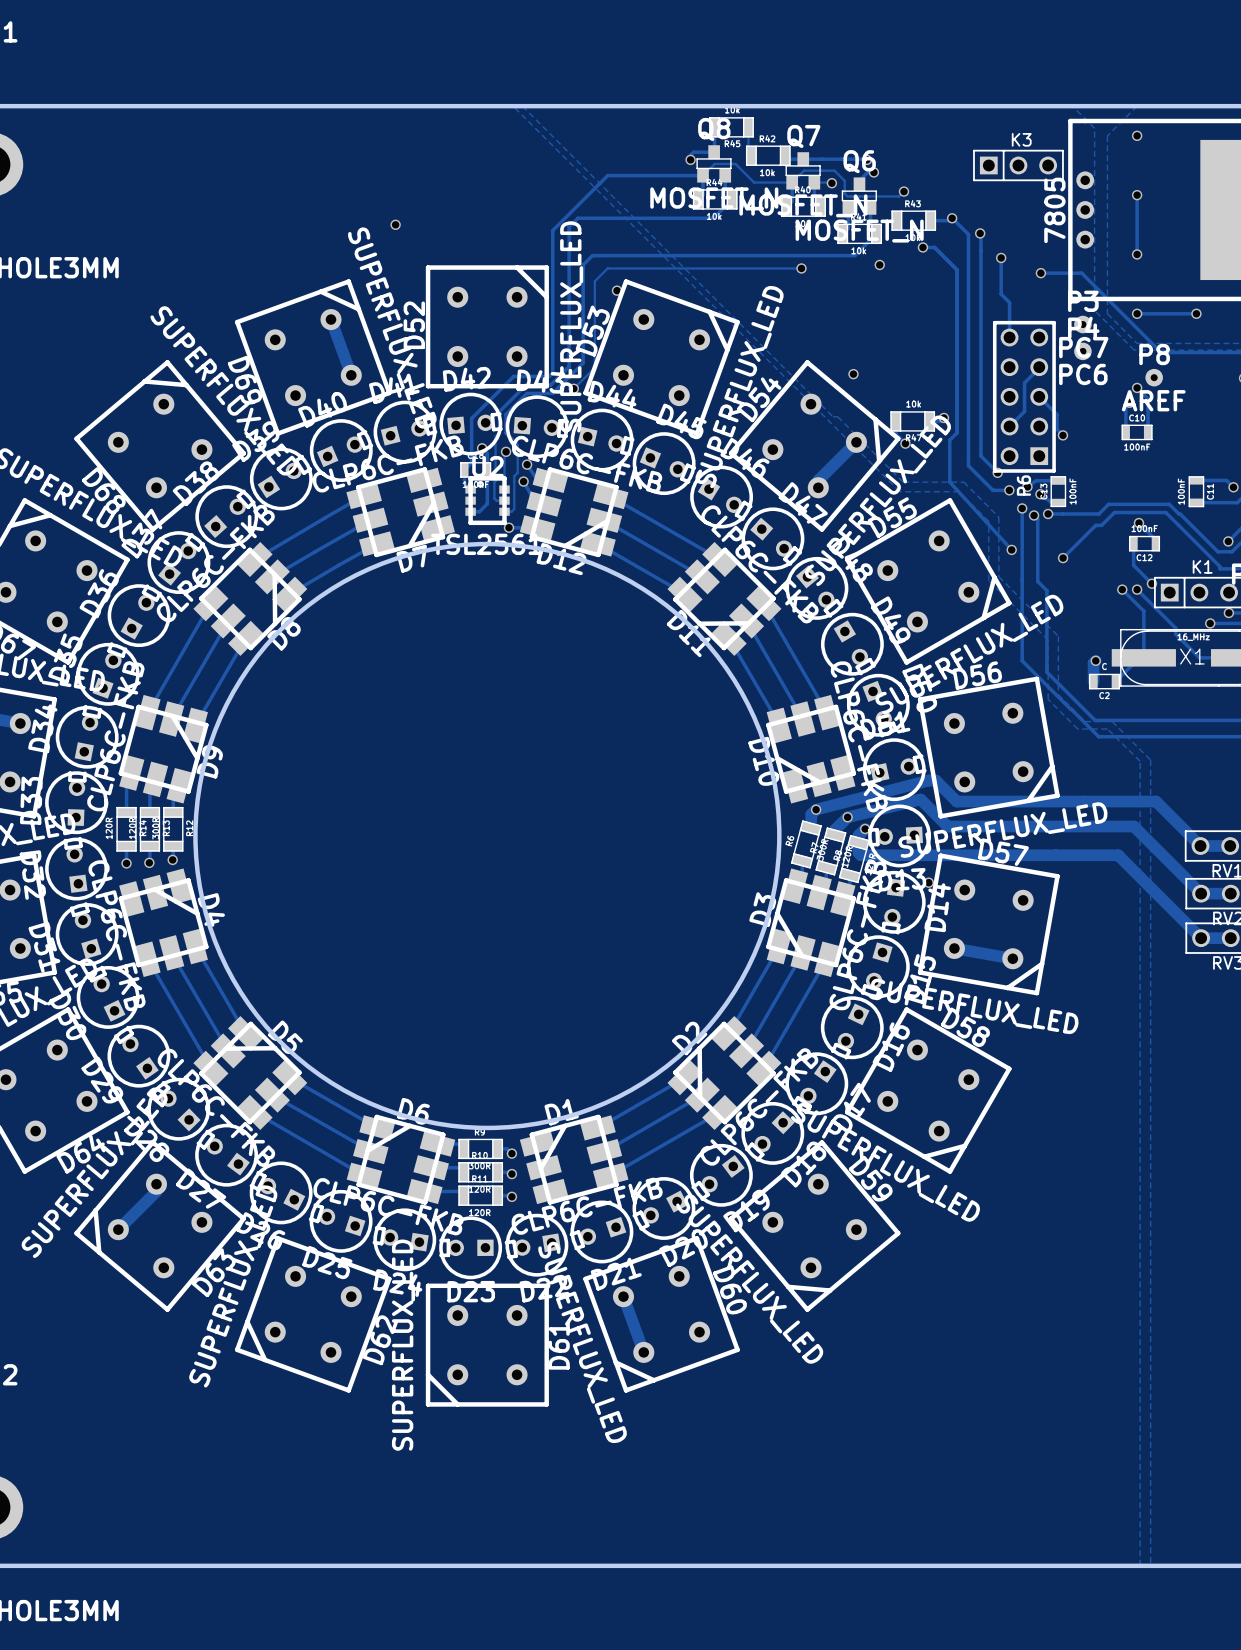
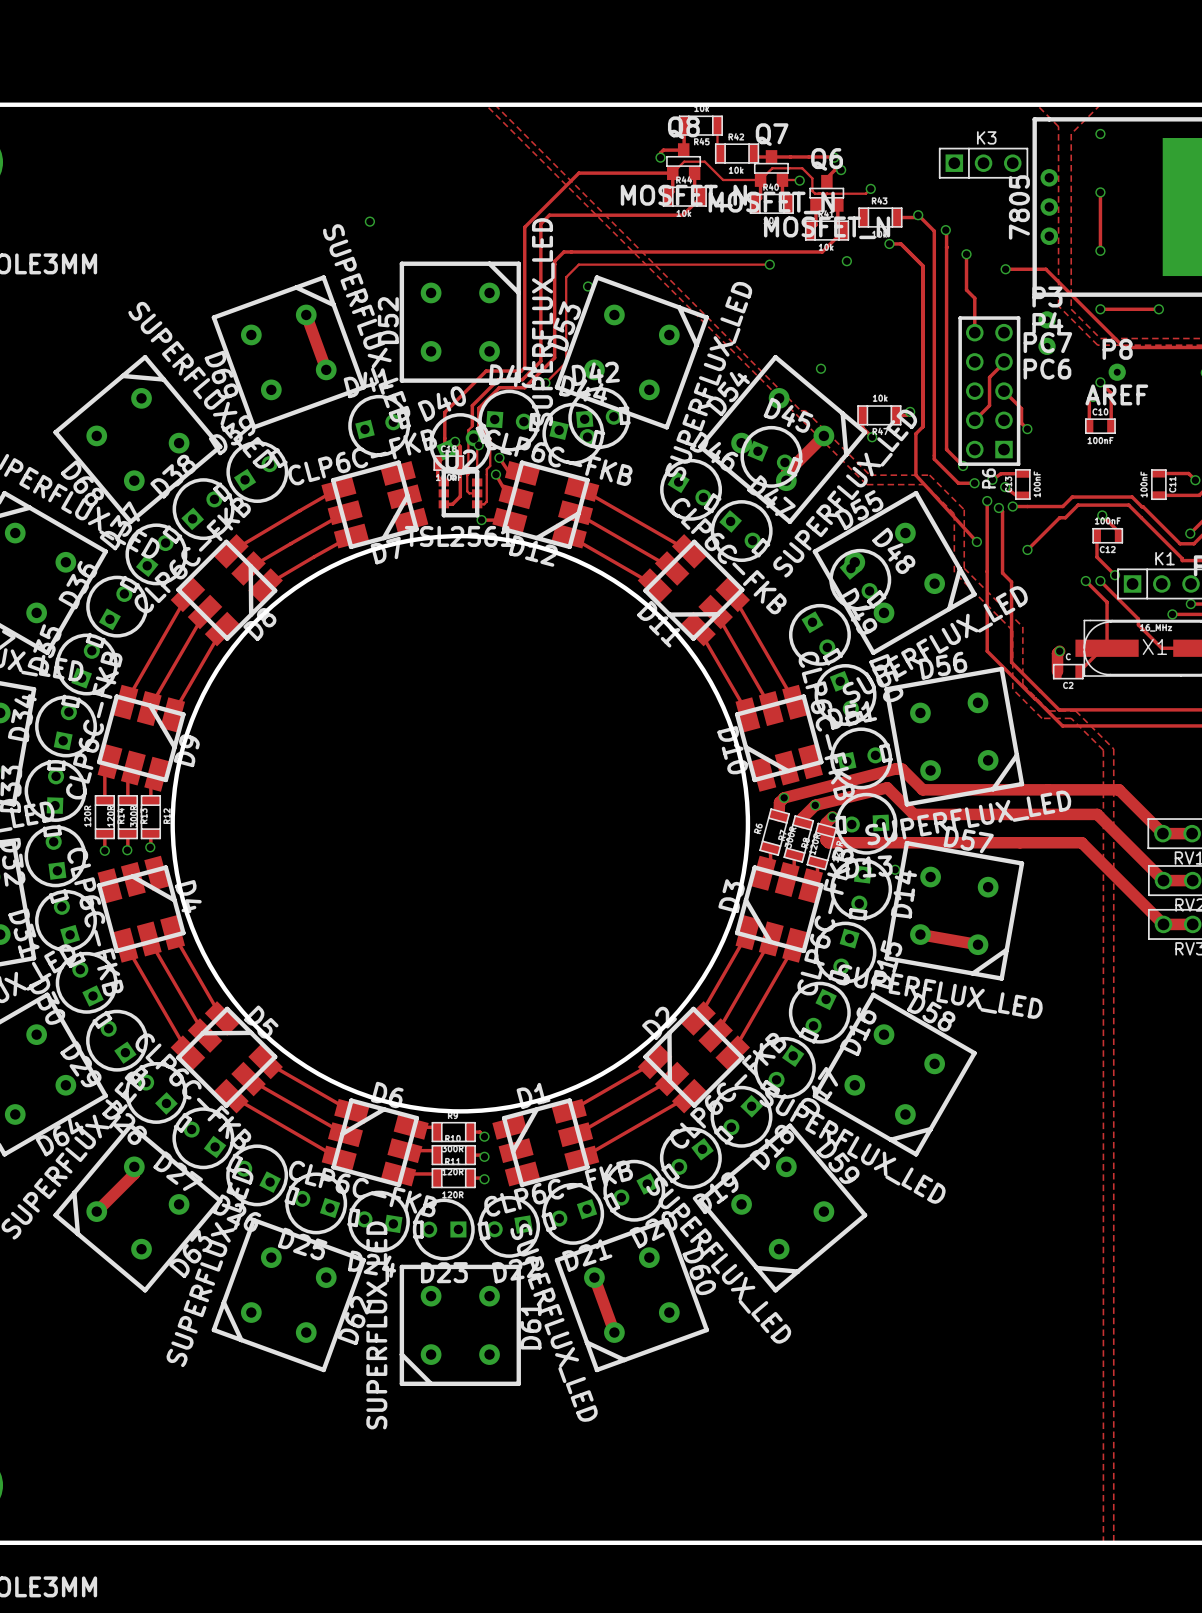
D42 position: (471, 424) -> (599, 417)
D40 position: (341, 450) -> (460, 444)
D45 position: (664, 463) -> (771, 456)
D48 position: (816, 588) -> (860, 579)

